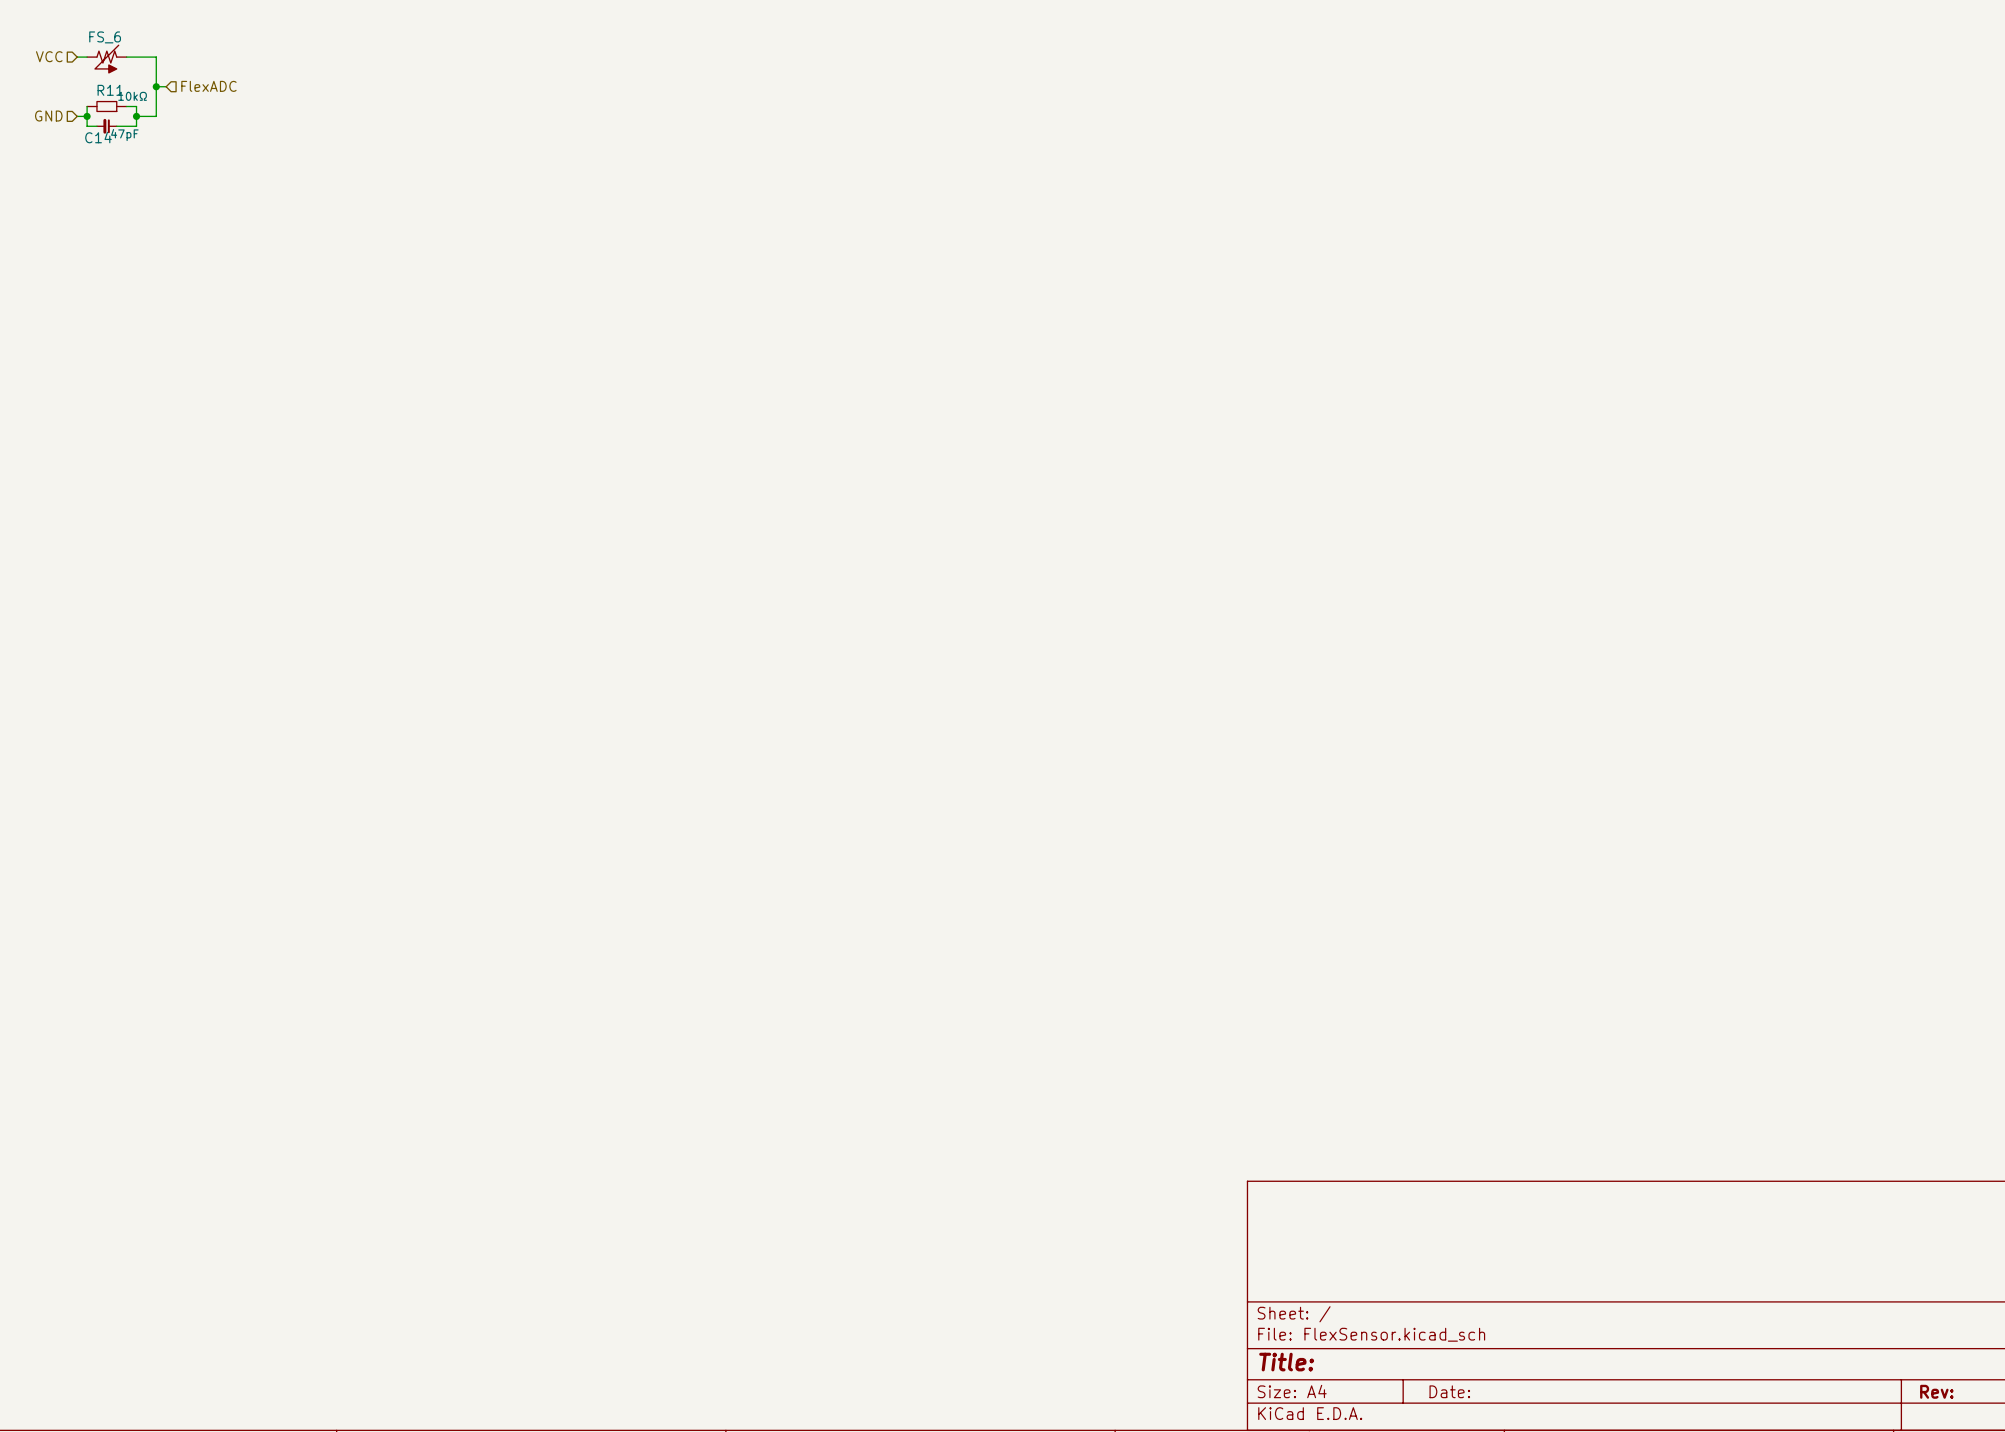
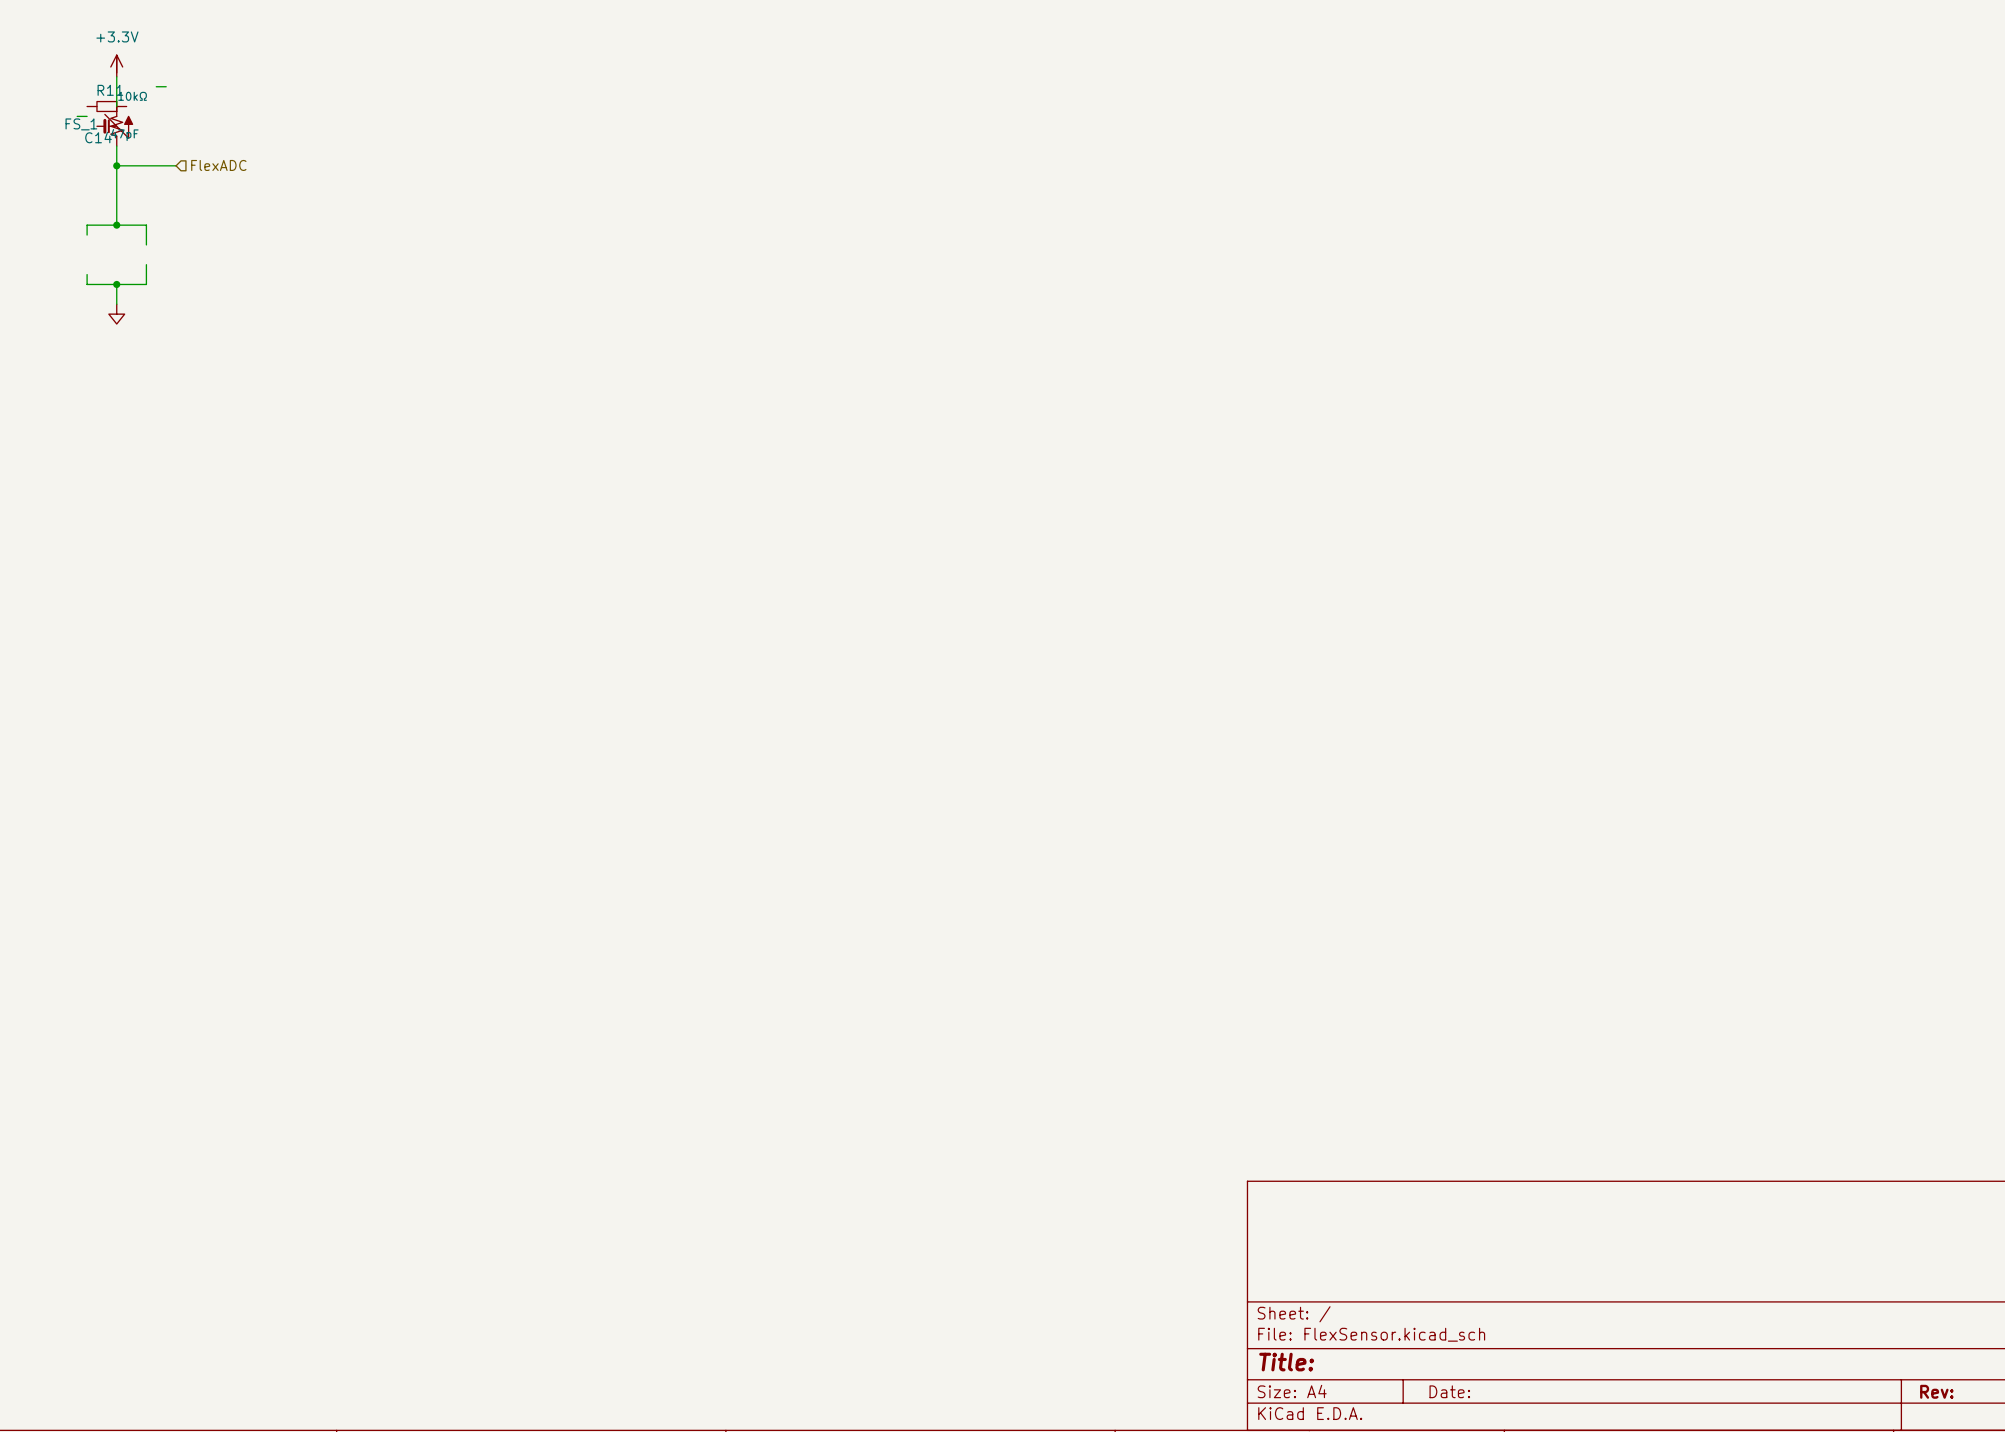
hierarchical label: VCC (49, 56) -> none
wire: (77, 57) (87, 57) -> none
wire: (126, 57) (156, 57) (156, 116) (136, 116) -> none
FS_6: (106, 59) -> none
power symbol: none -> +3.3V (116, 65)
wire: none -> (116, 76) (116, 106)
junction: (156, 86) -> none
hierarchical label position: FlexADC (208, 86) -> FlexADC (218, 165)
wire: (87, 106) (87, 126) (96, 126) -> none
wire: (126, 106) (136, 106) (136, 126) (116, 126) -> none
hierarchical label: GND (48, 116) -> none
junction: (87, 116) -> none
junction: (136, 116) -> none
FS_1: none -> (118, 126)
wire: none -> (116, 146) (116, 225)
wire: none -> (116, 165) (176, 165)
junction: none -> (116, 165)
junction: none -> (116, 225)
wire: none -> (87, 235) (87, 225) (146, 225) (146, 244)
wire: none -> (146, 264) (146, 284) (87, 284) (87, 274)
wire: none -> (116, 284) (116, 304)
junction: none -> (116, 284)
power symbol: none -> (116, 314)

